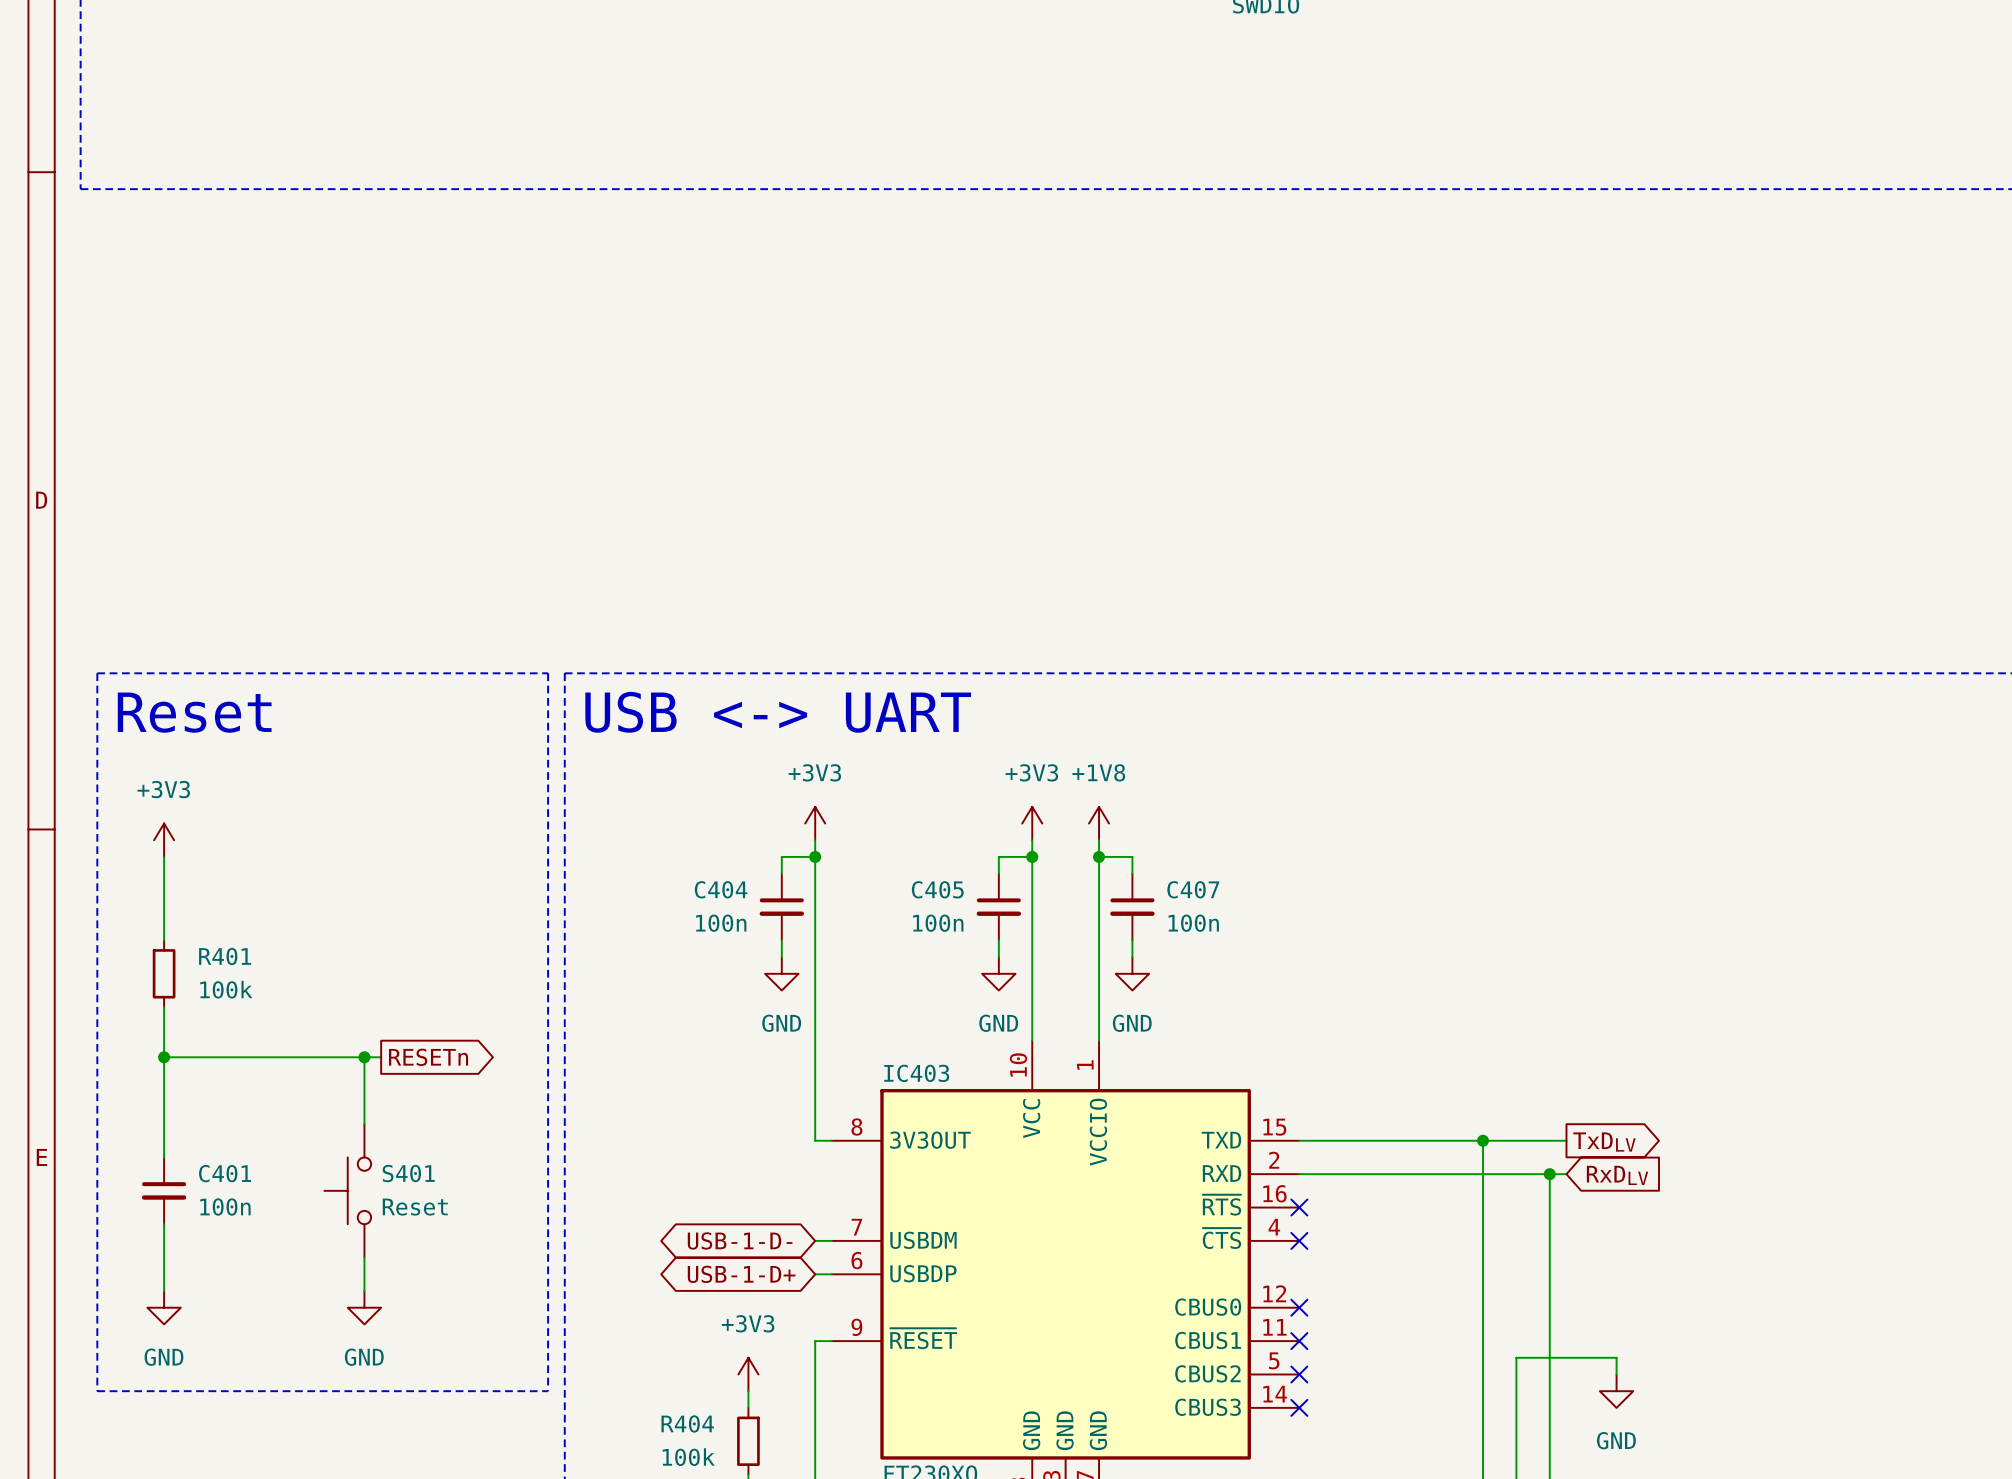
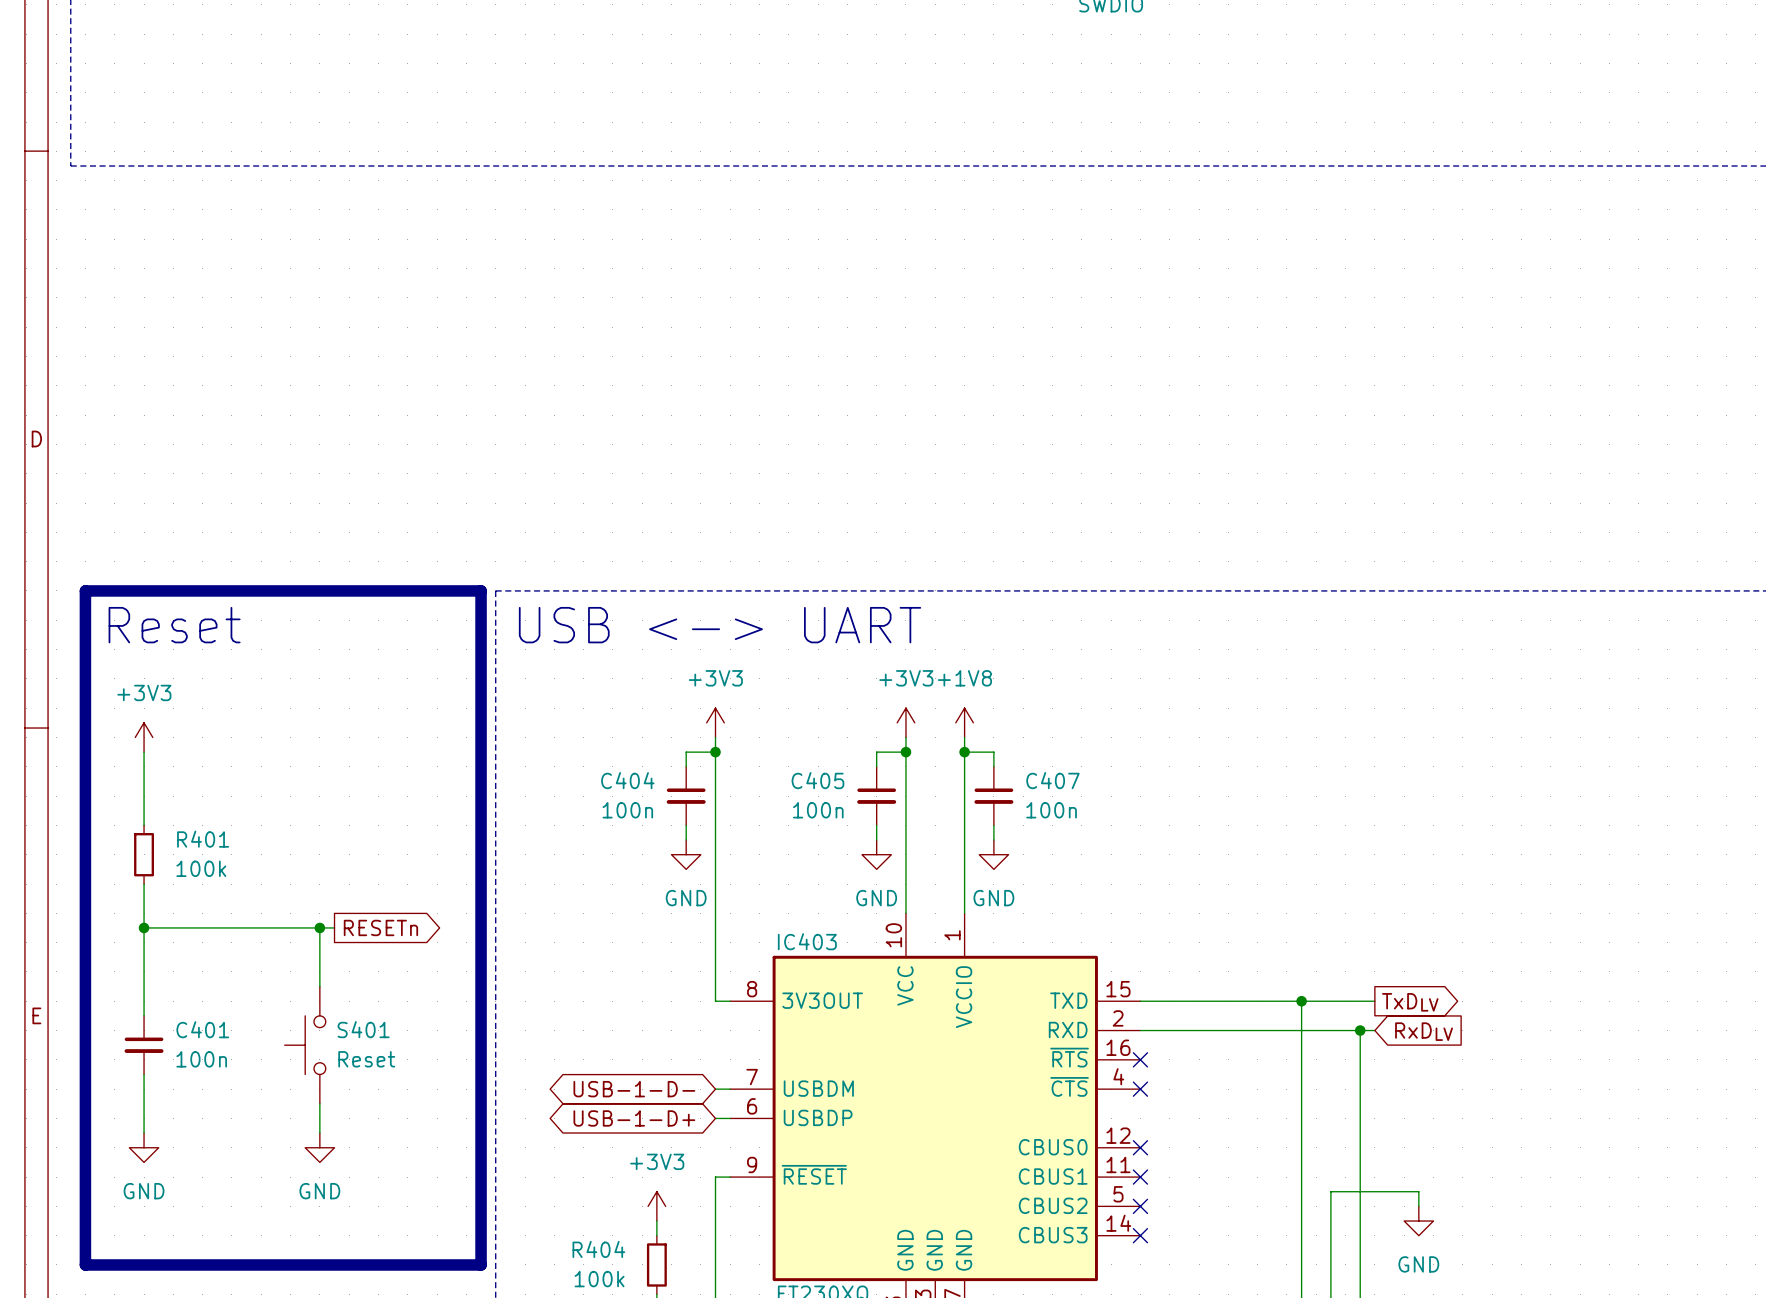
line: (97, 673) (97, 1391) (548, 1391) (548, 673) (97, 673) -> (85, 590) (85, 1264) (481, 1264) (481, 590) (85, 590)

